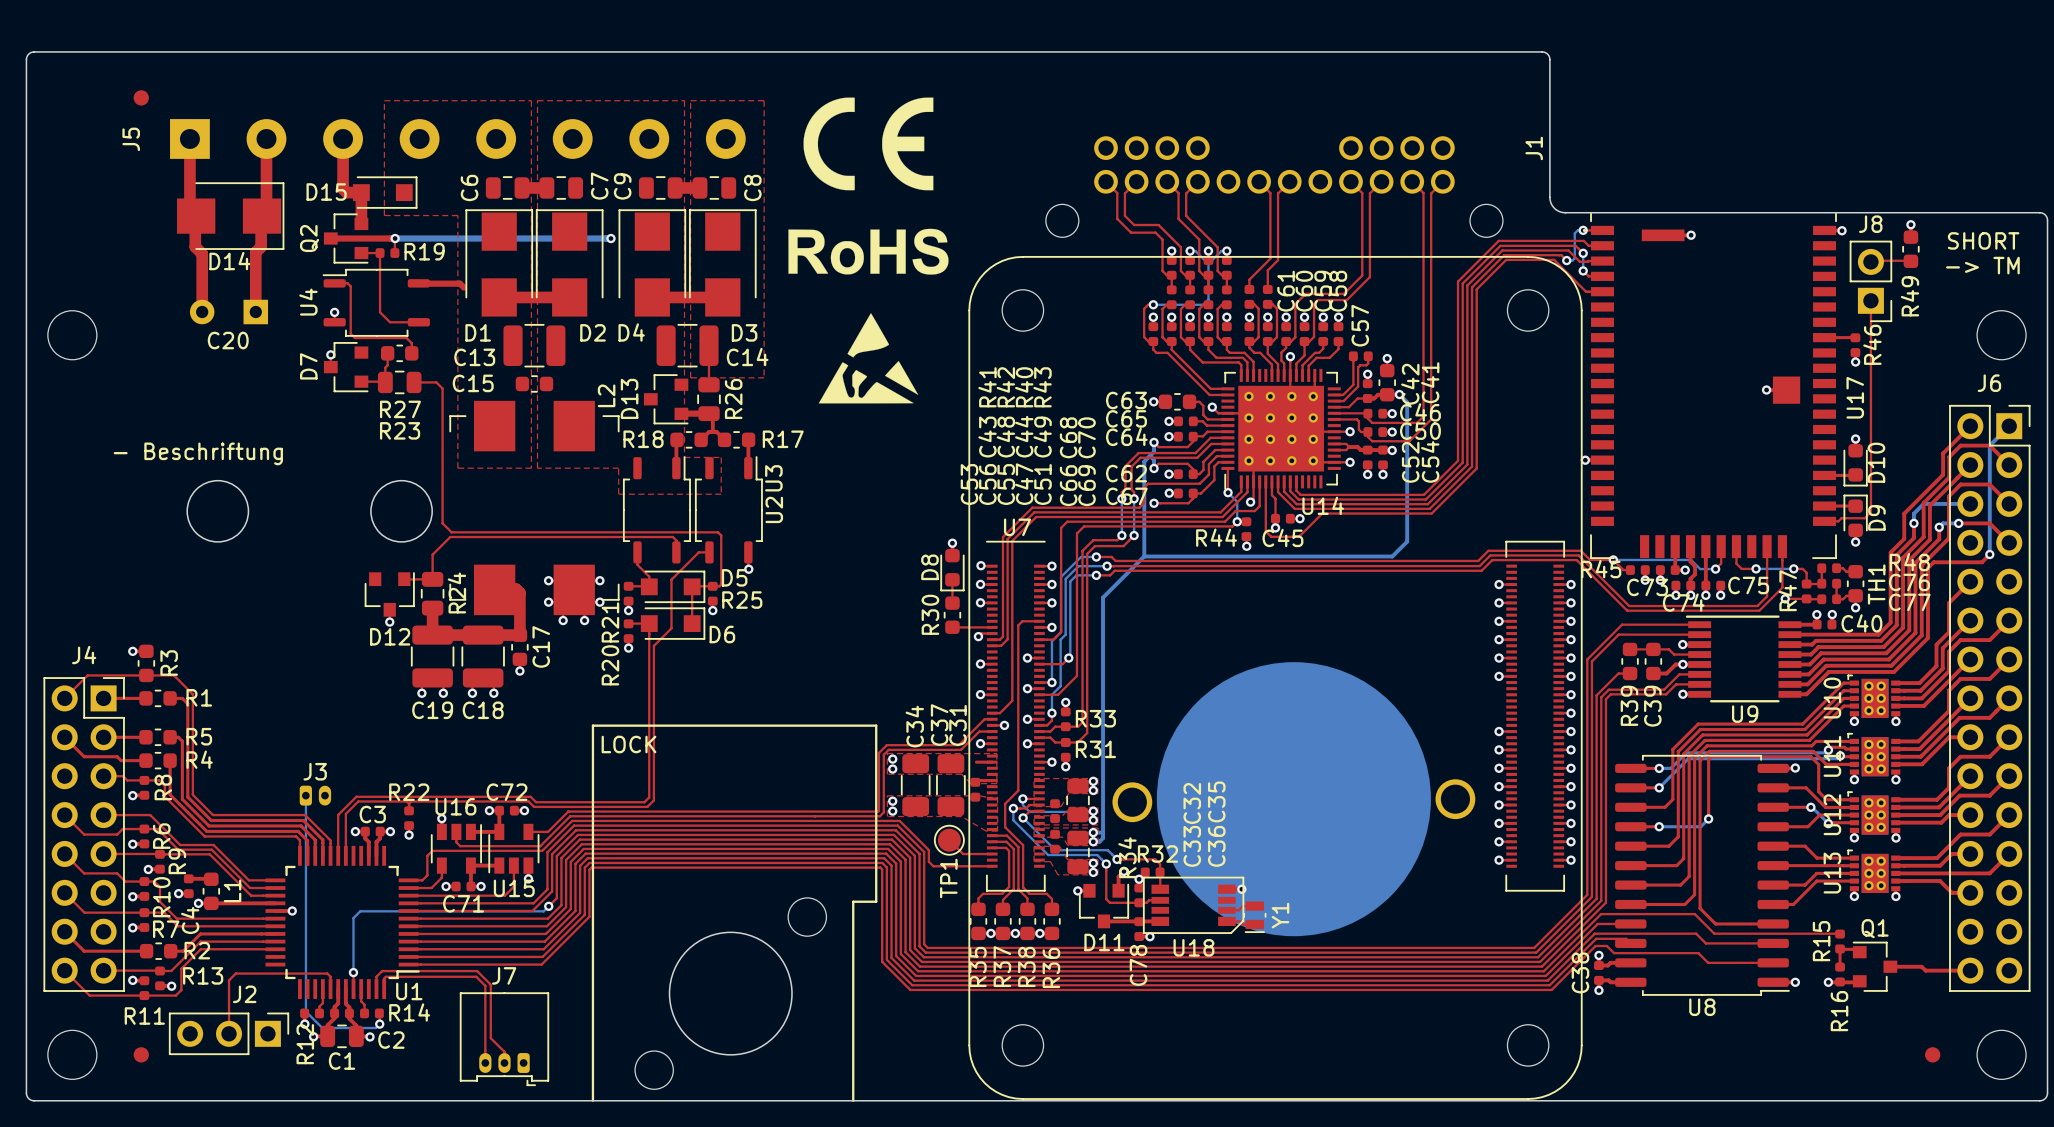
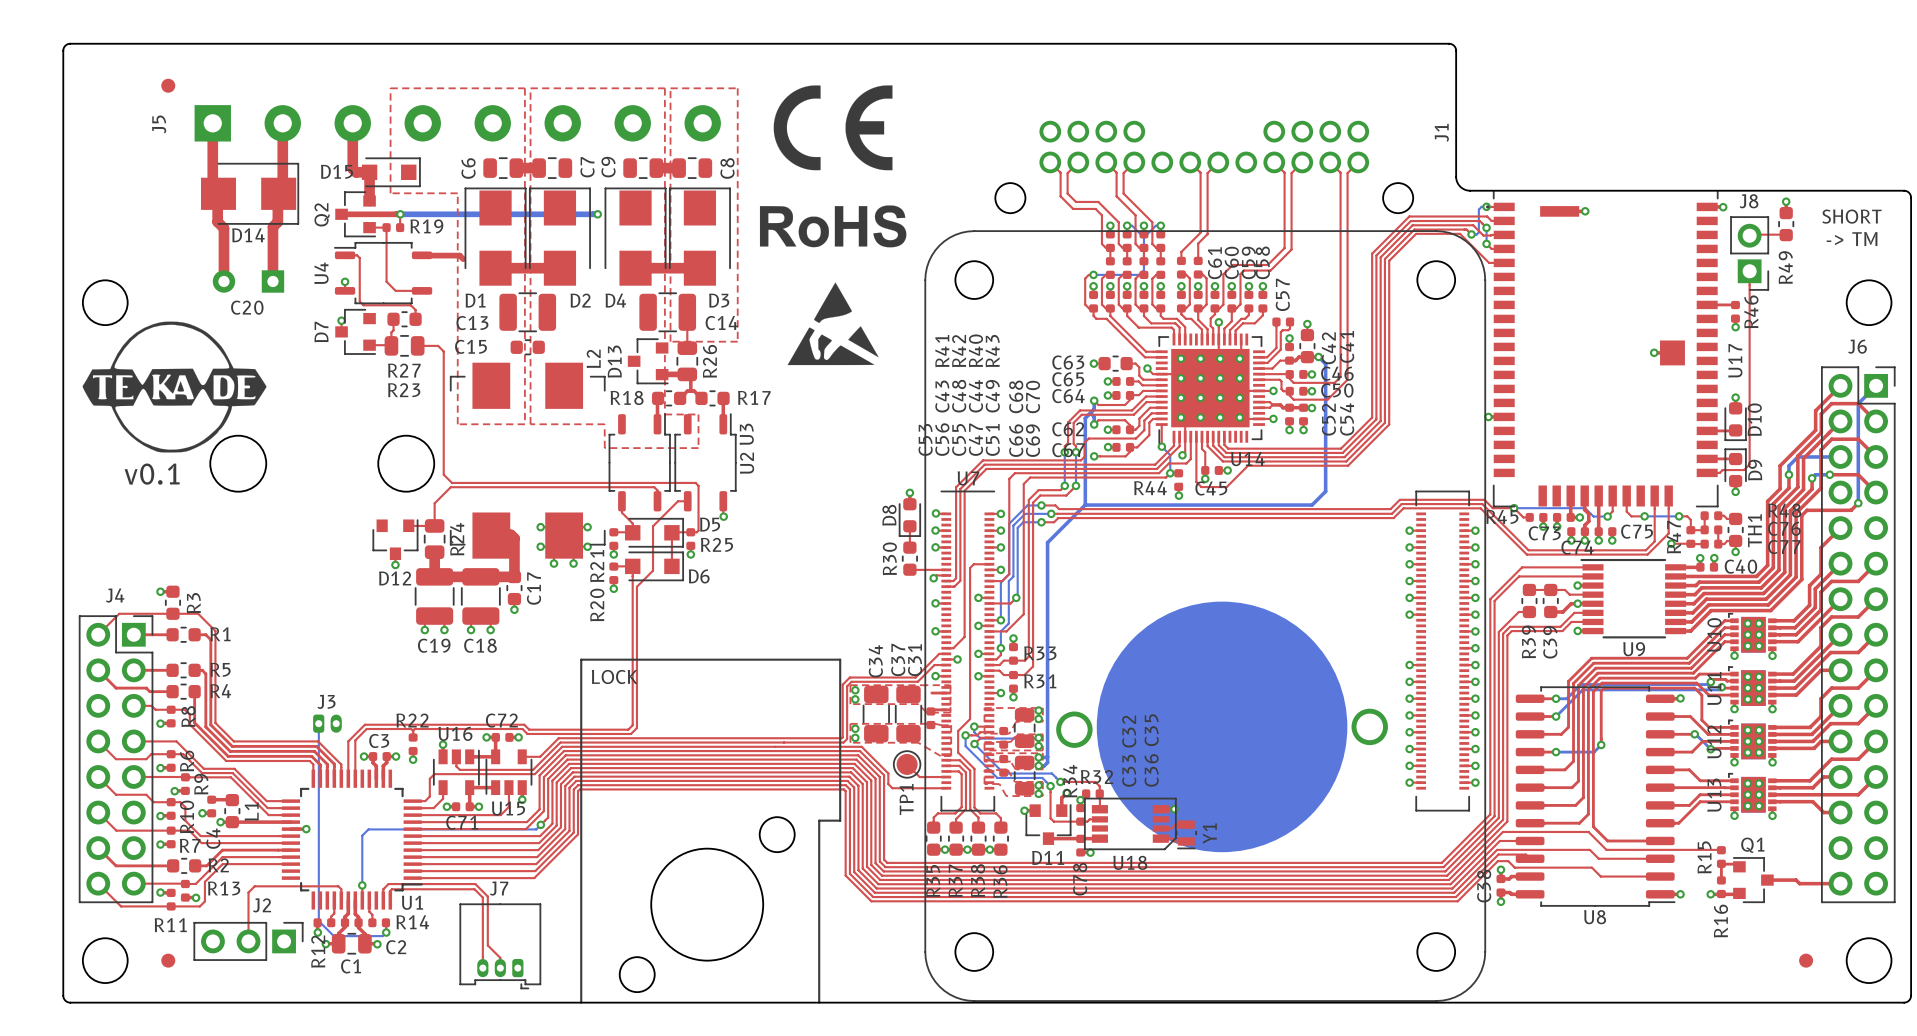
drawing: none -> [82, 321, 267, 453]
text: - Beschriftung (198, 453) -> none
text: none -> v0.1 (152, 474)

